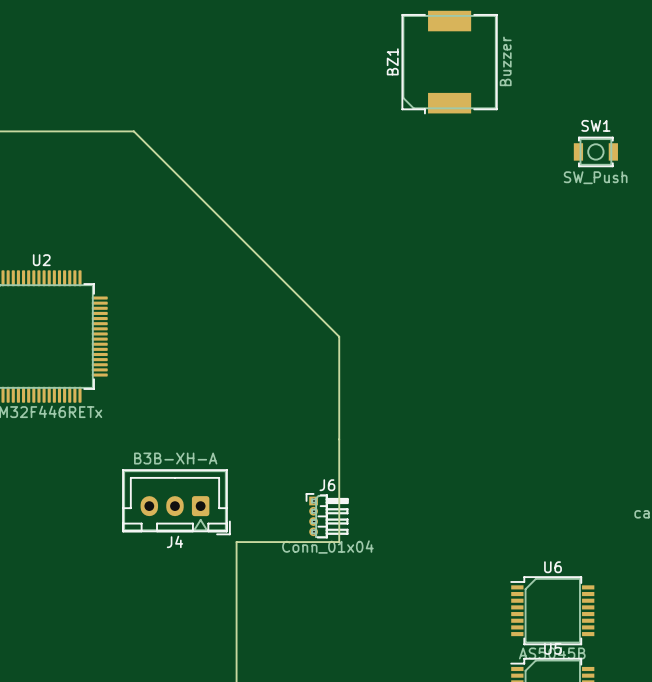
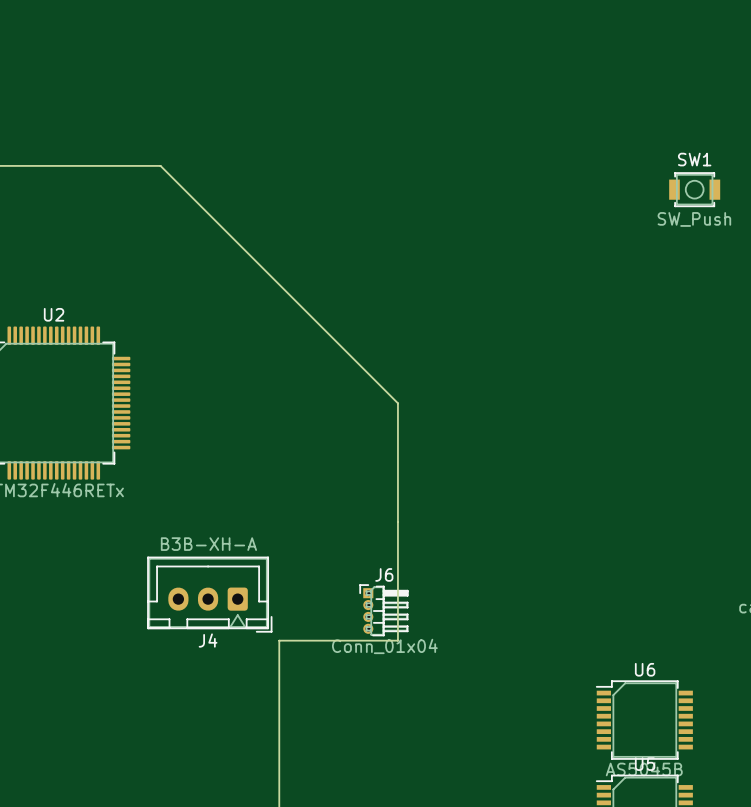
BZ1: Buzzer (449, 62) -> none

